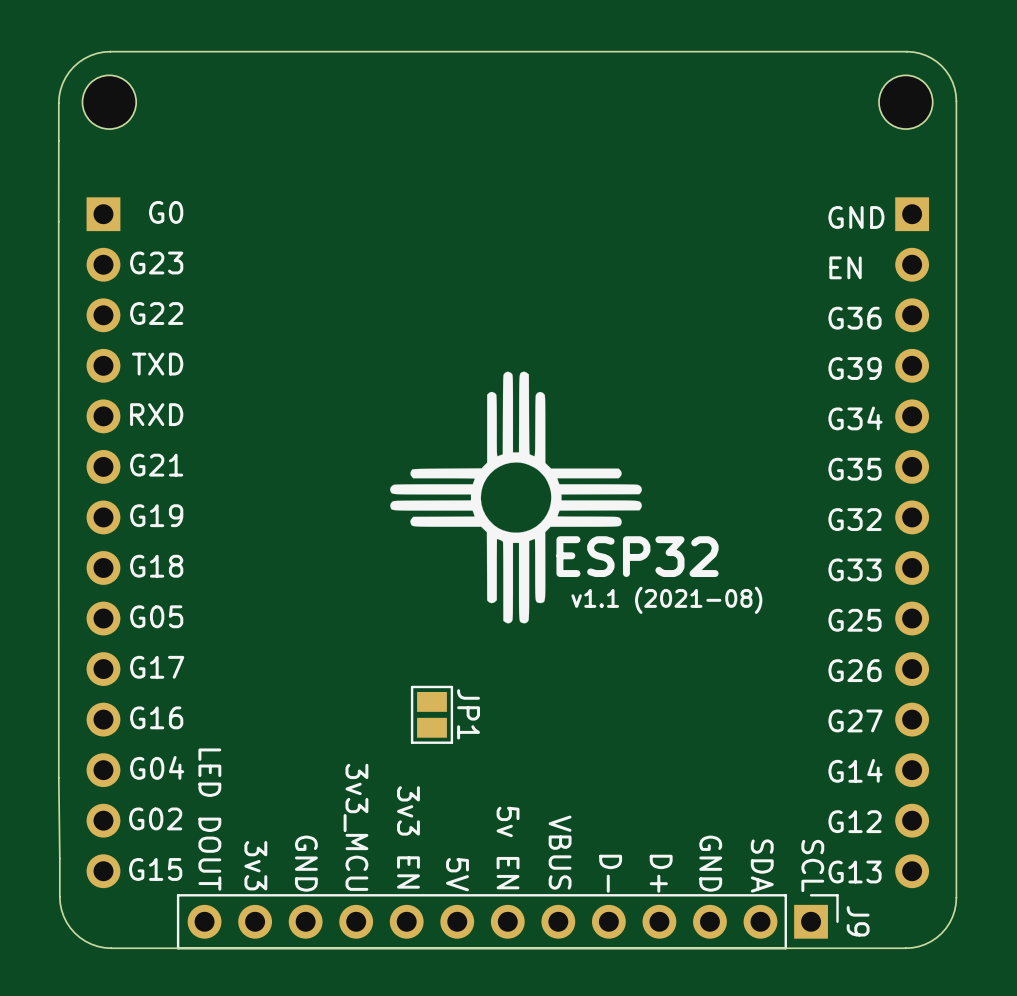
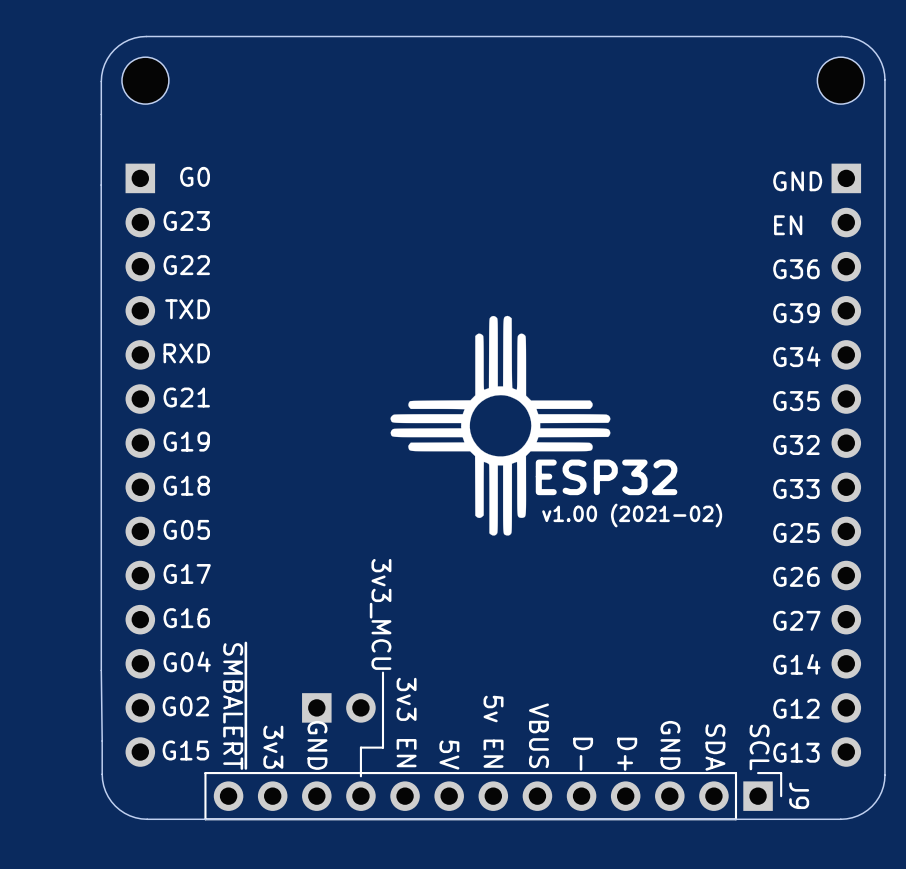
text: v1.1 (2021-08) (666, 600) -> v1.00 (2021-02) (632, 515)
JP1: (431, 714) -> none
line: none -> (382, 672) (382, 747) (360, 747) (360, 776)
text: LED DOUT (209, 819) -> ~{SMBALERT} (235, 705)
part: none -> (338, 707)
text position: 3v3_MCU (355, 827) -> 3v3_MCU (380, 614)

